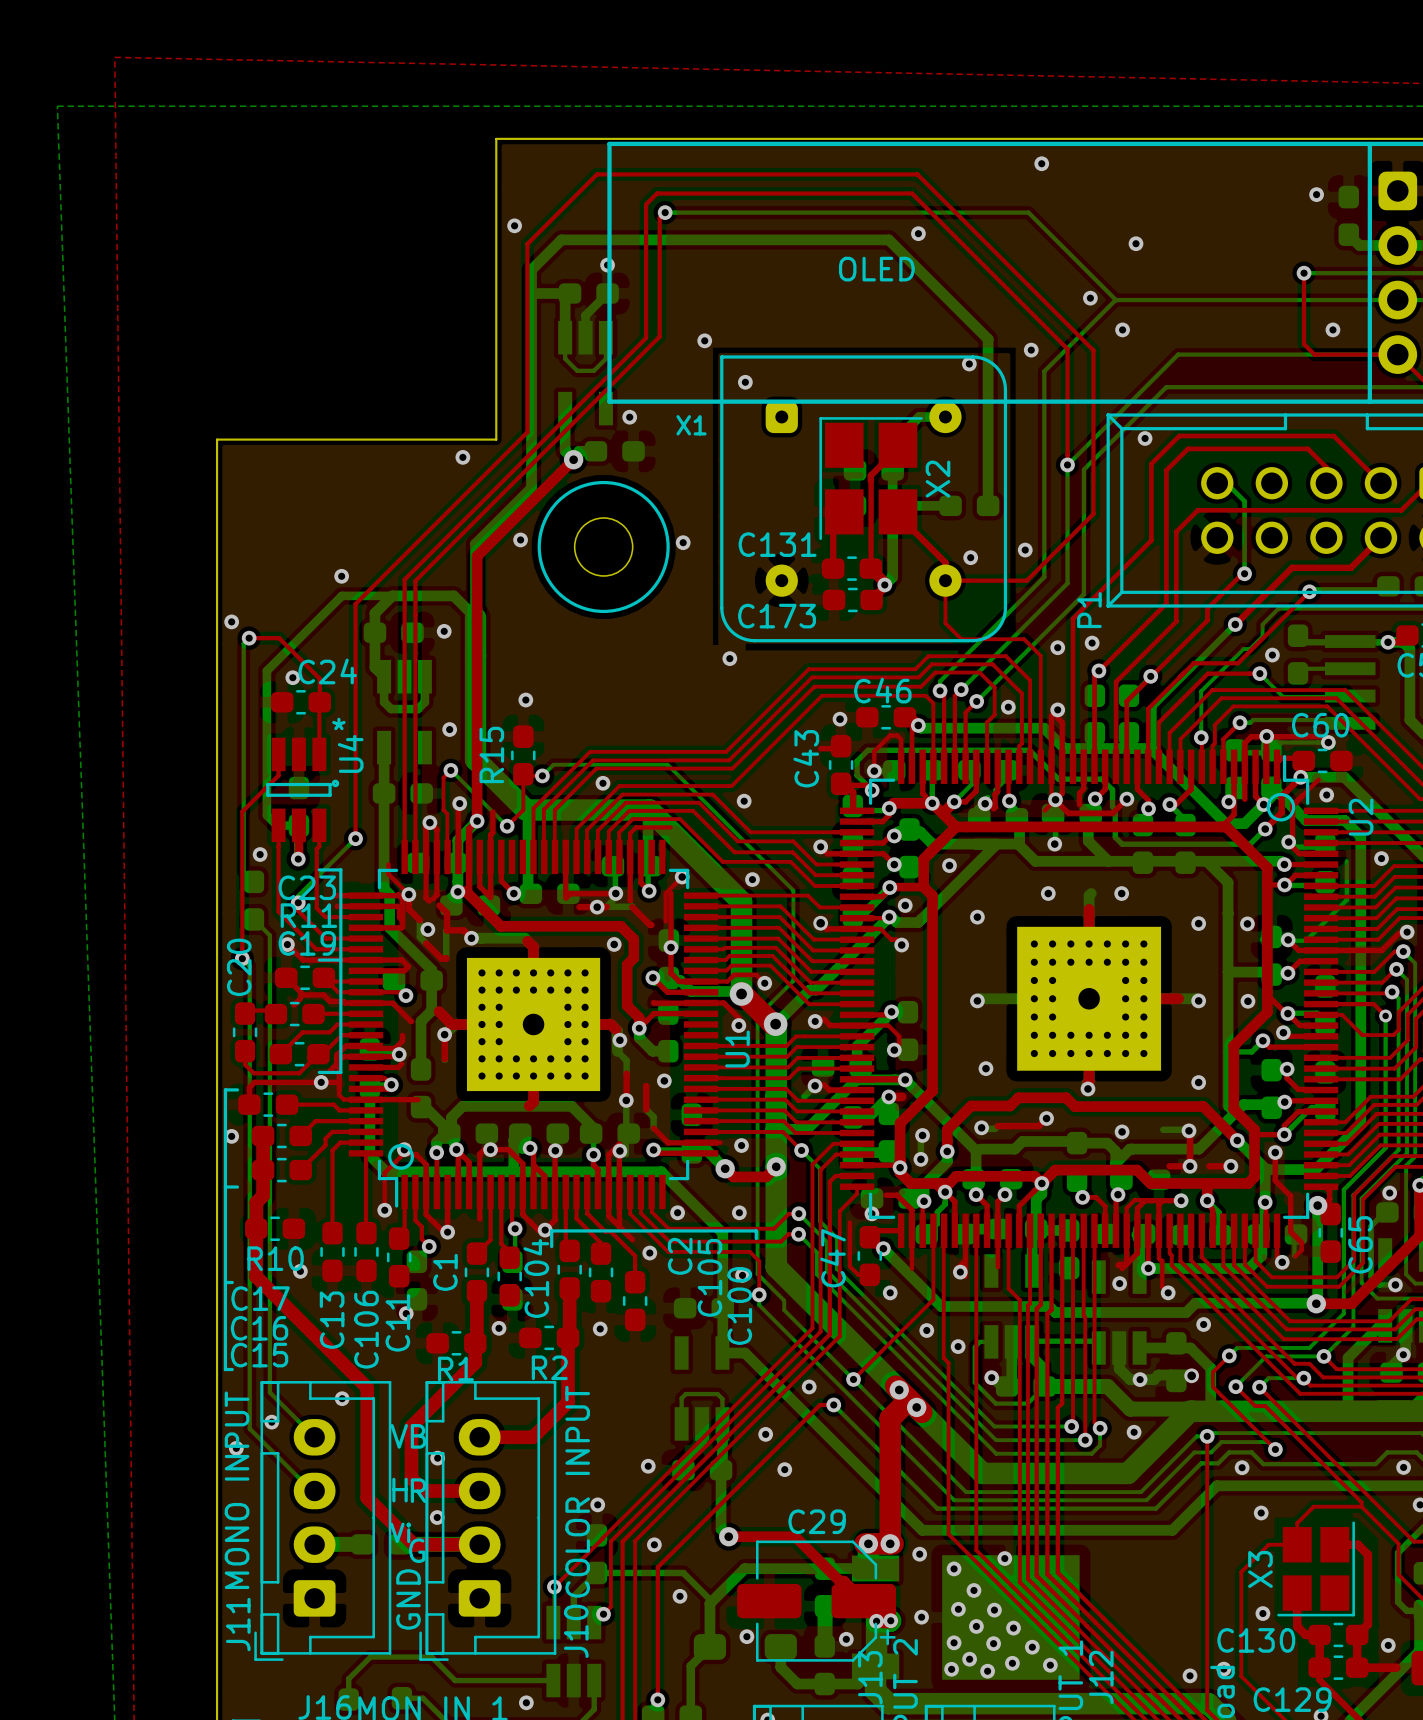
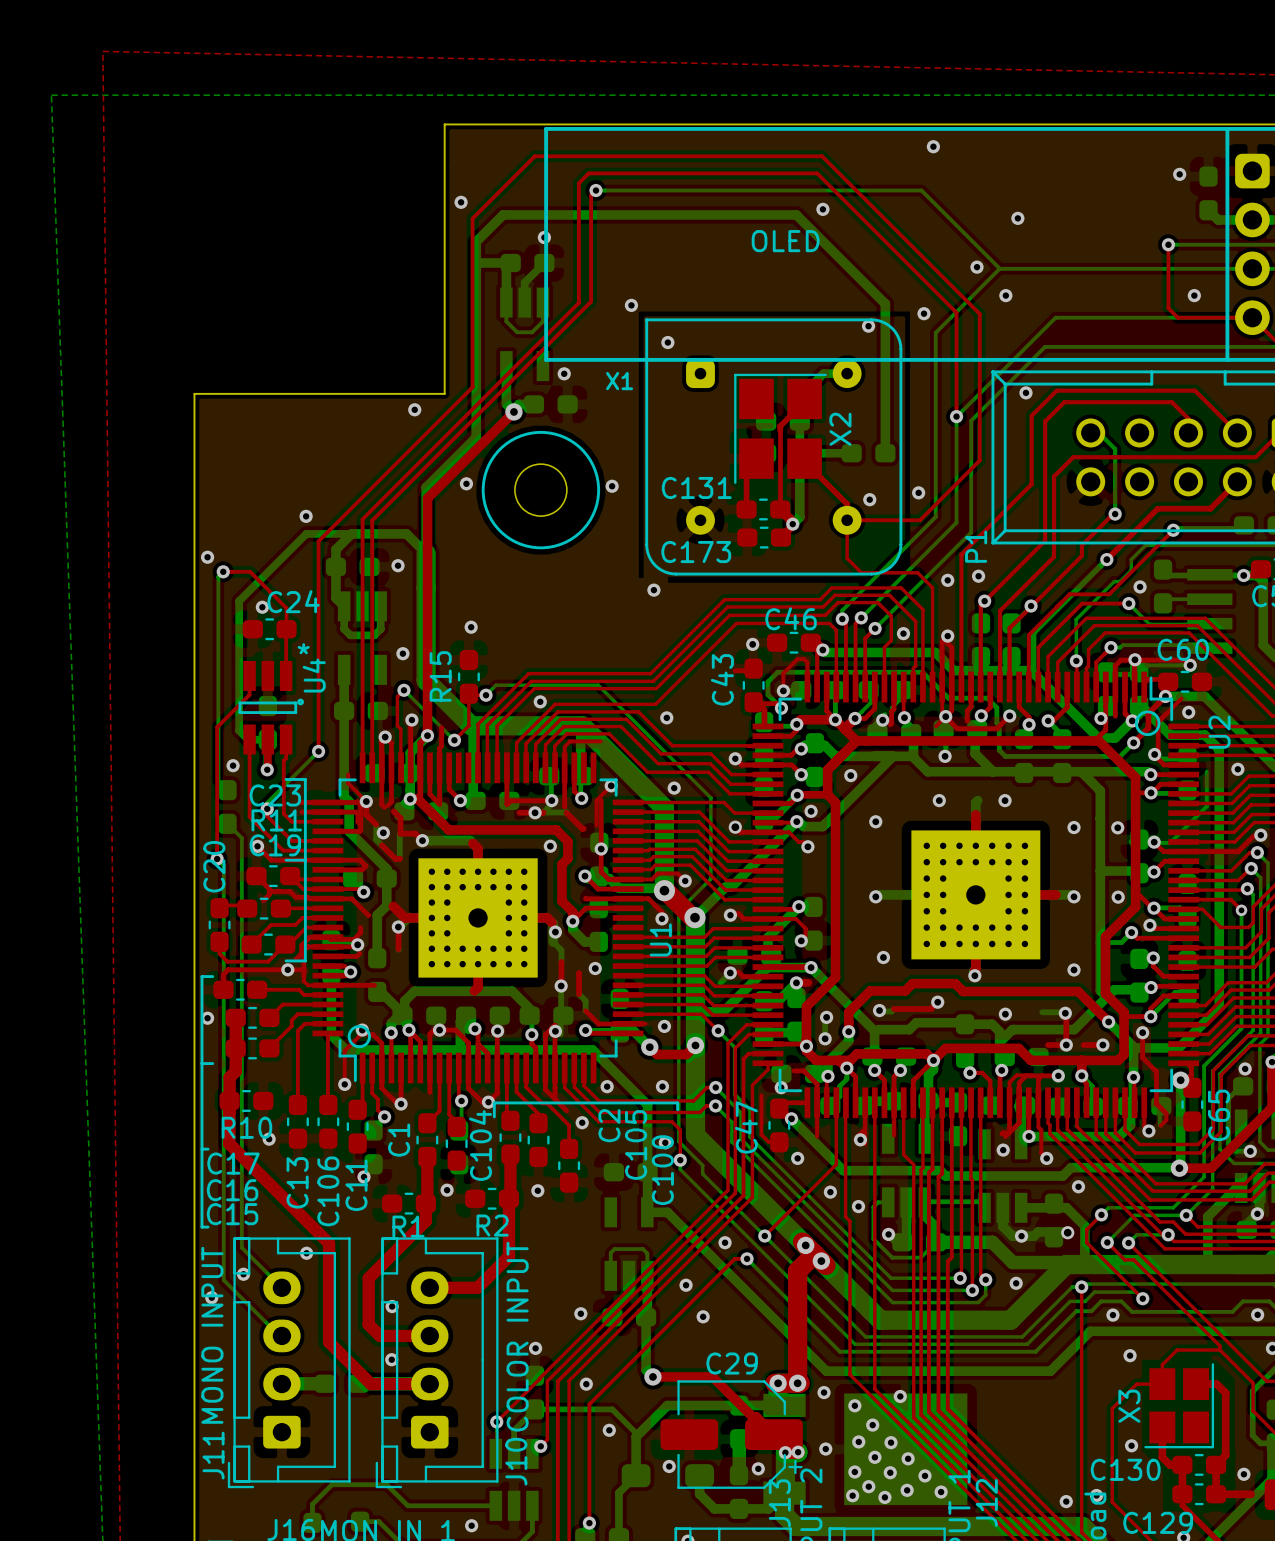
text: V (399, 1436) -> none
text: B (418, 1436) -> none
text: H (400, 1490) -> none
text: R (418, 1490) -> none
text: Vi (400, 1532) -> none
text: G (417, 1550) -> none
text: GND (408, 1599) -> none

